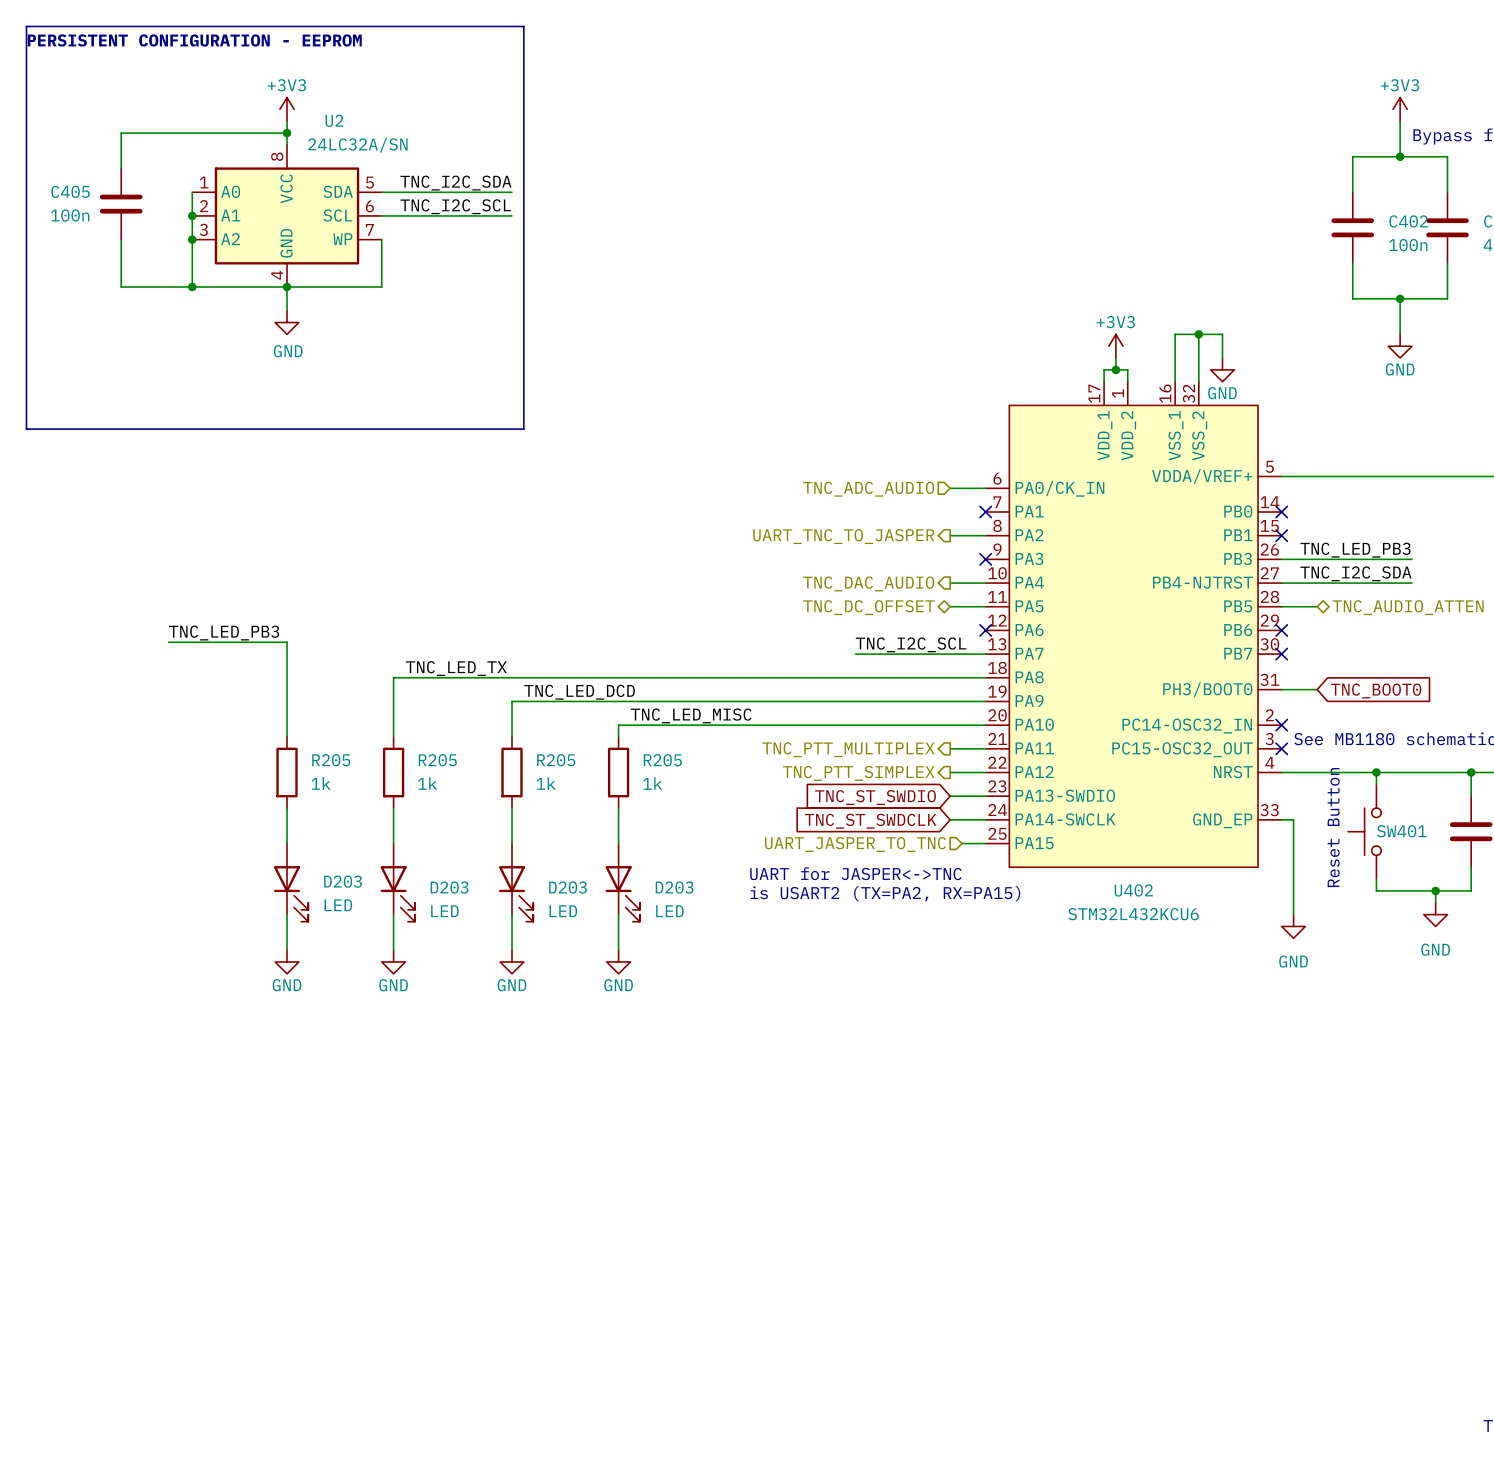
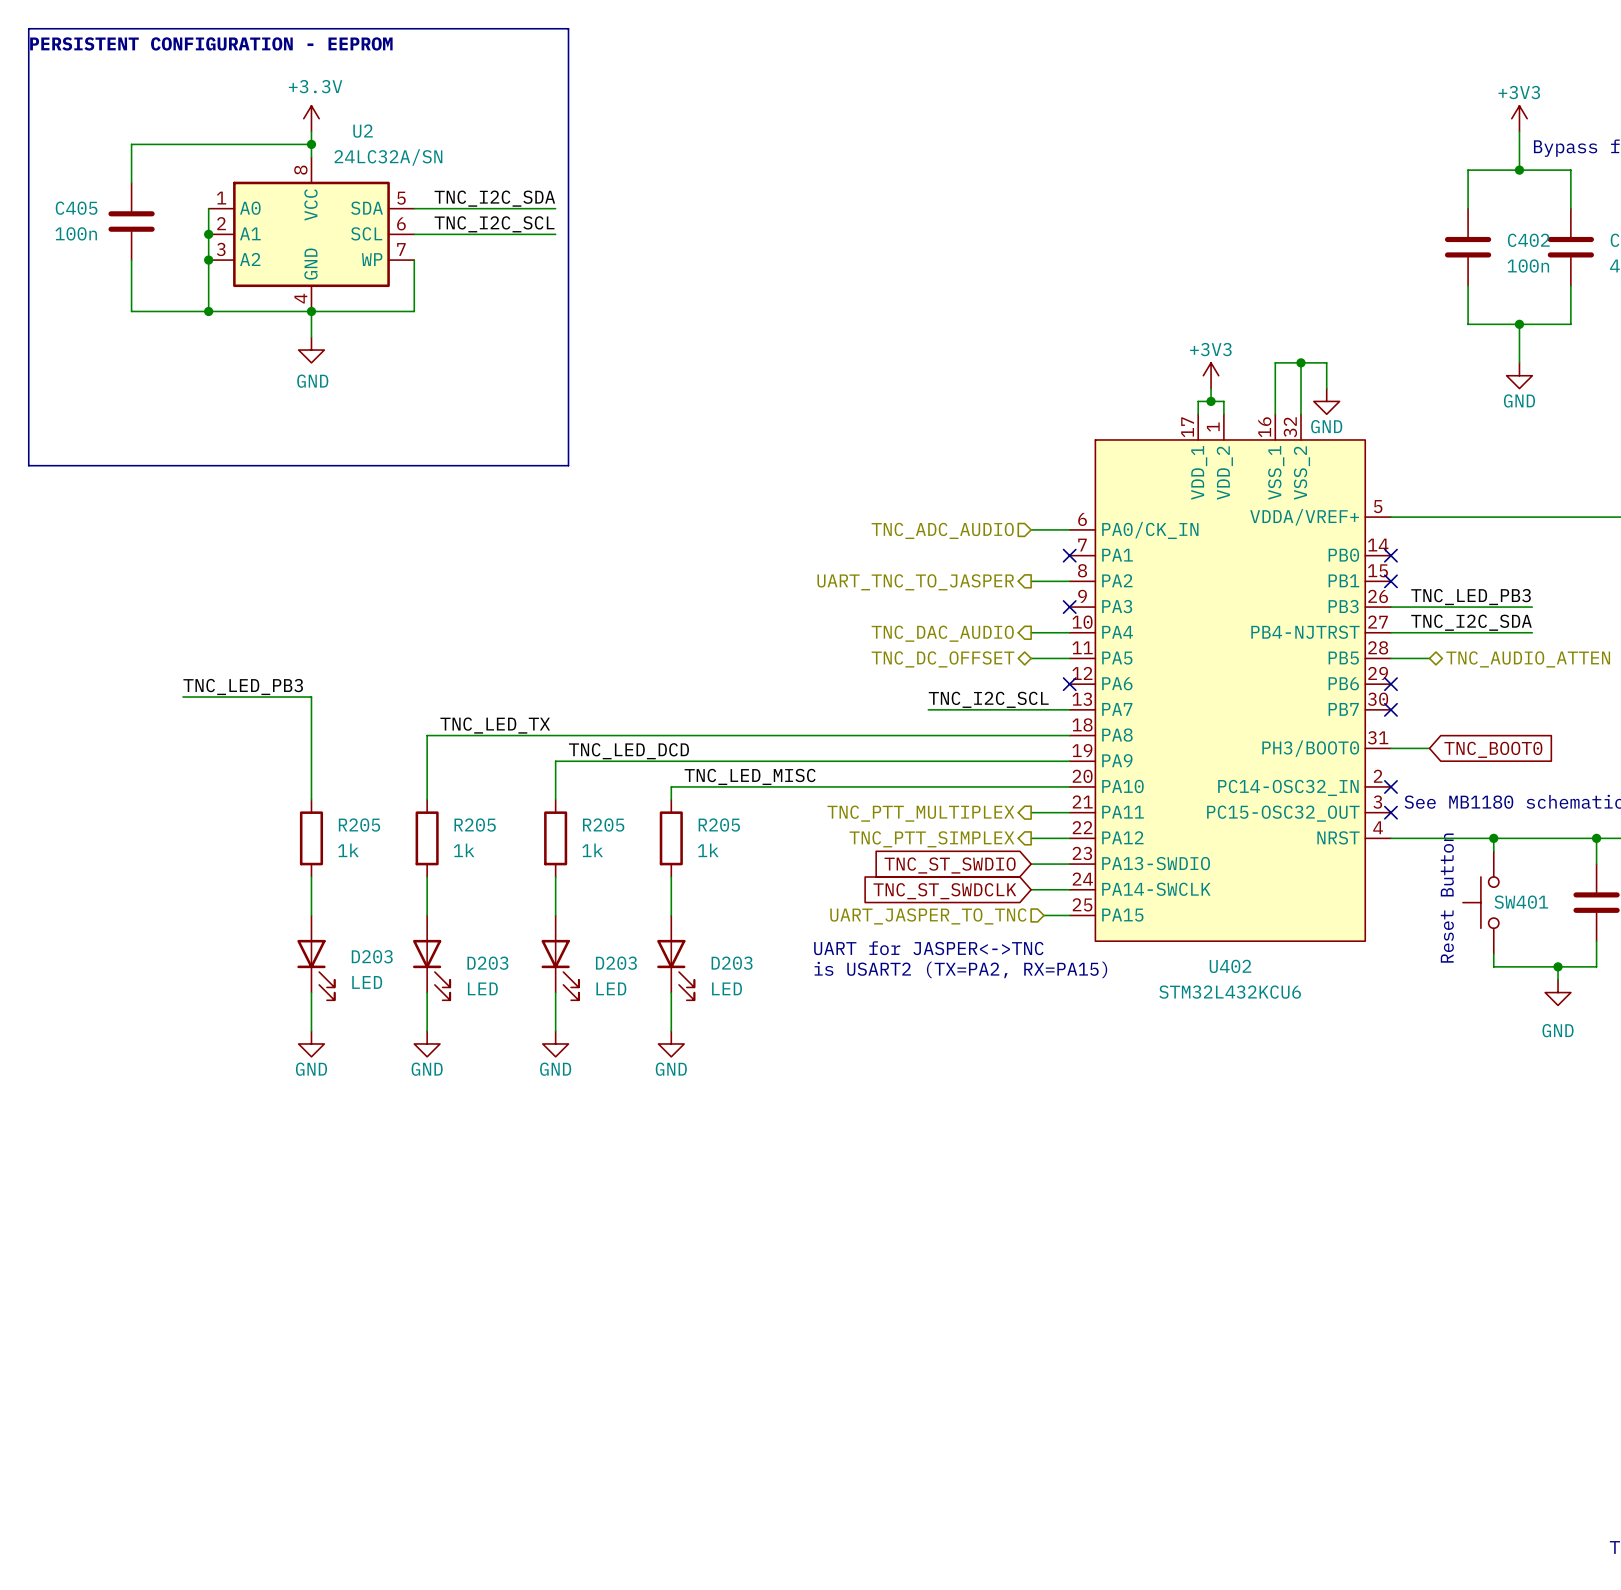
power symbol: +3V3 (287, 109) -> +3.3V (311, 118)
U402 symbol: [985, 381, 1282, 868] -> [1069, 414, 1391, 942]
wire: (1281, 819) (1293, 819) (1293, 914) -> none
power symbol: GND (1293, 926) -> none

